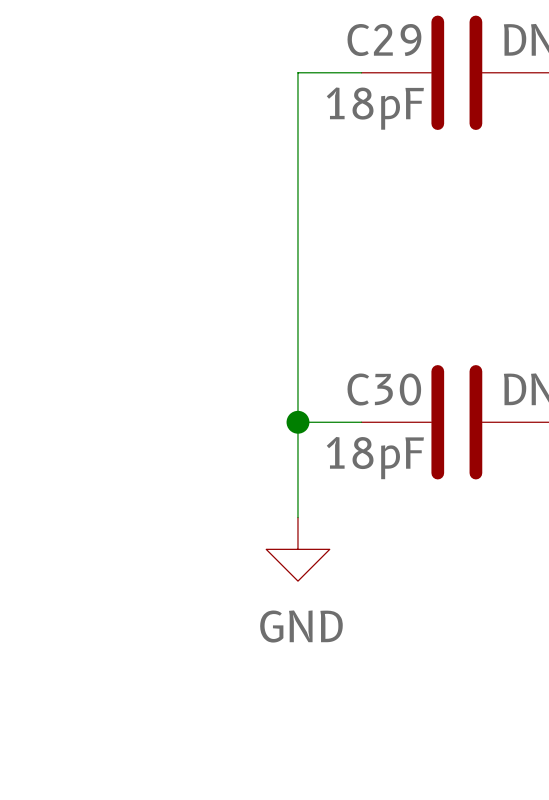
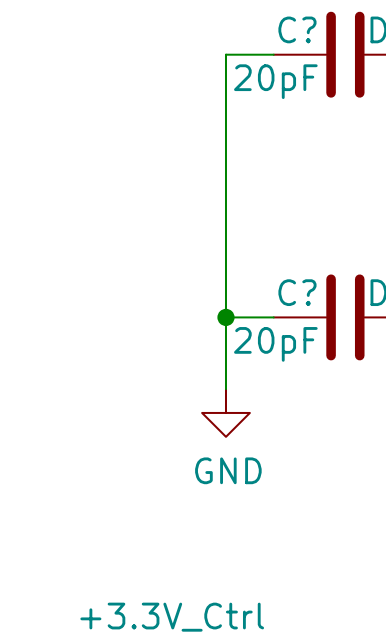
C29 name: C29 (384, 40) -> C? (297, 29)
C29 value: 18pF (375, 108) -> 20pF (275, 81)
C30 name: C30 (384, 389) -> C? (297, 292)
C30 value: 18pF (375, 458) -> 20pF (275, 344)

